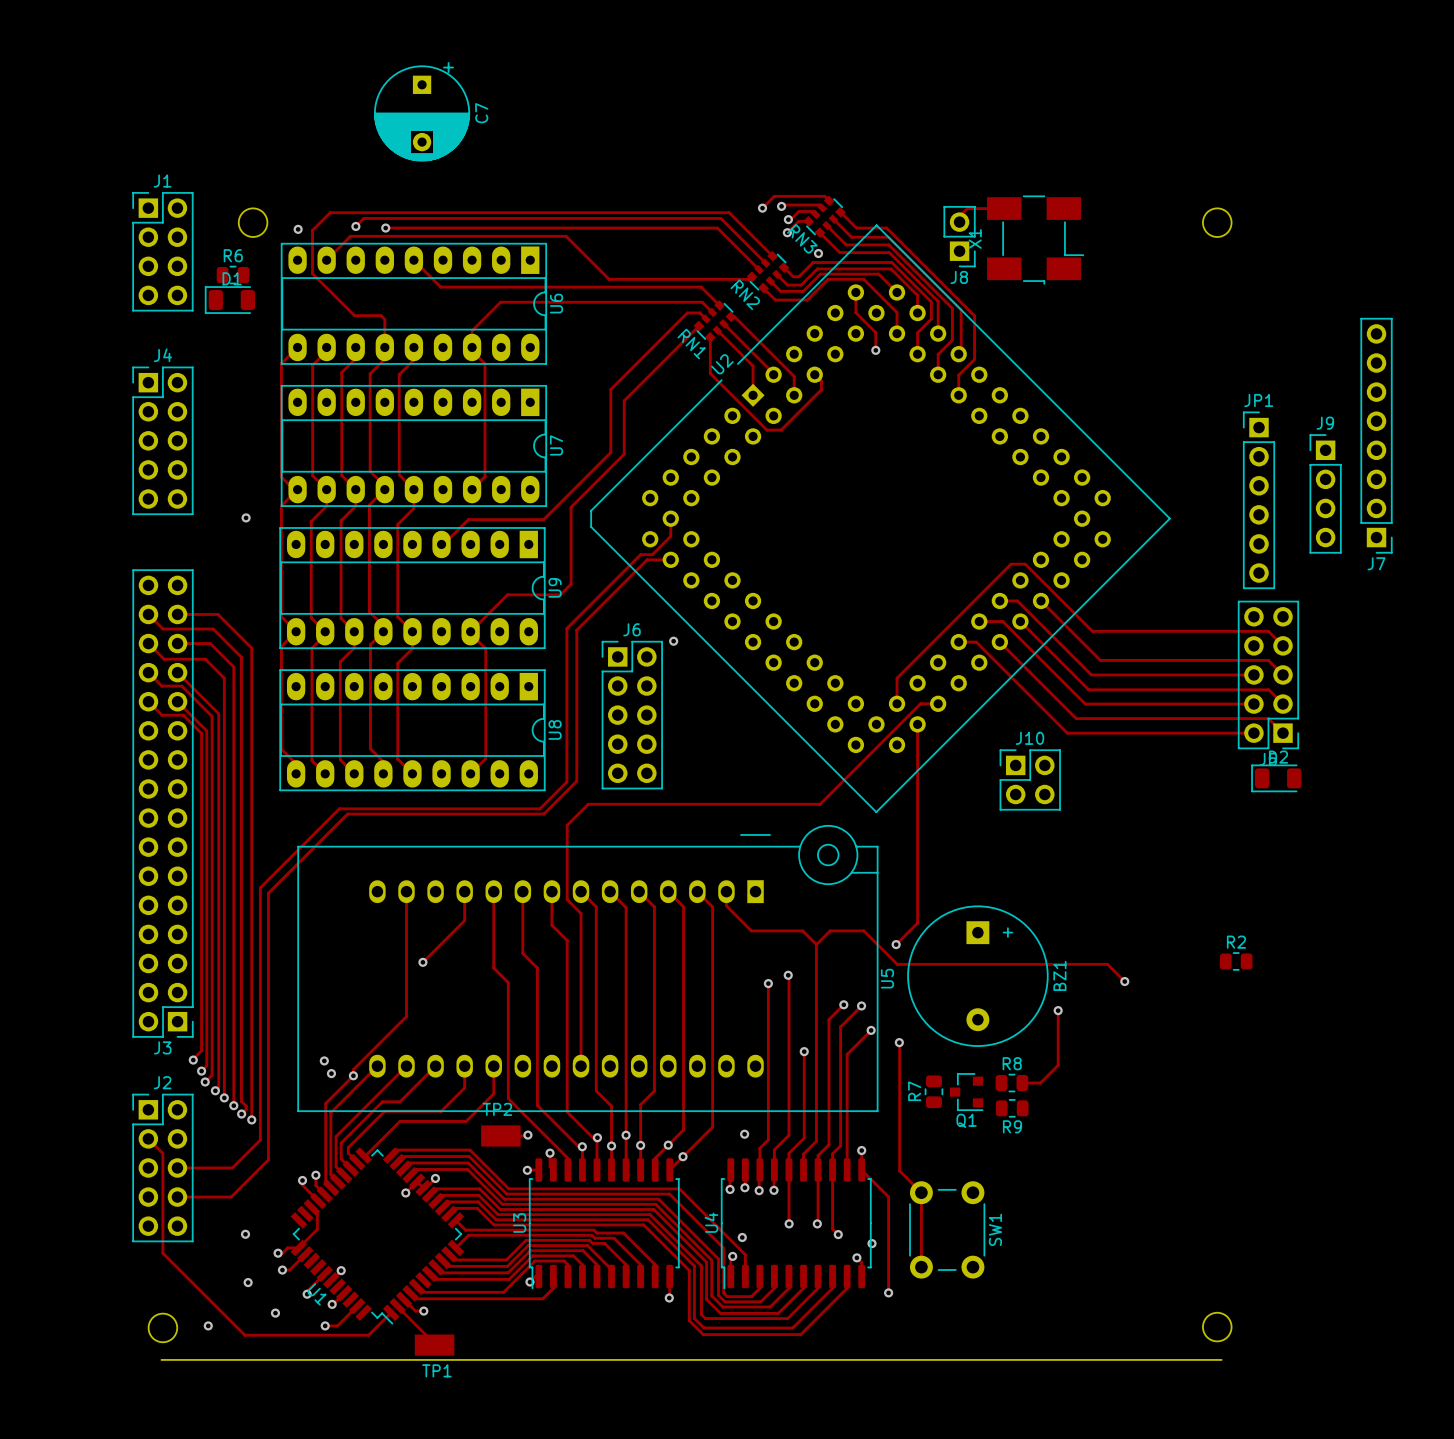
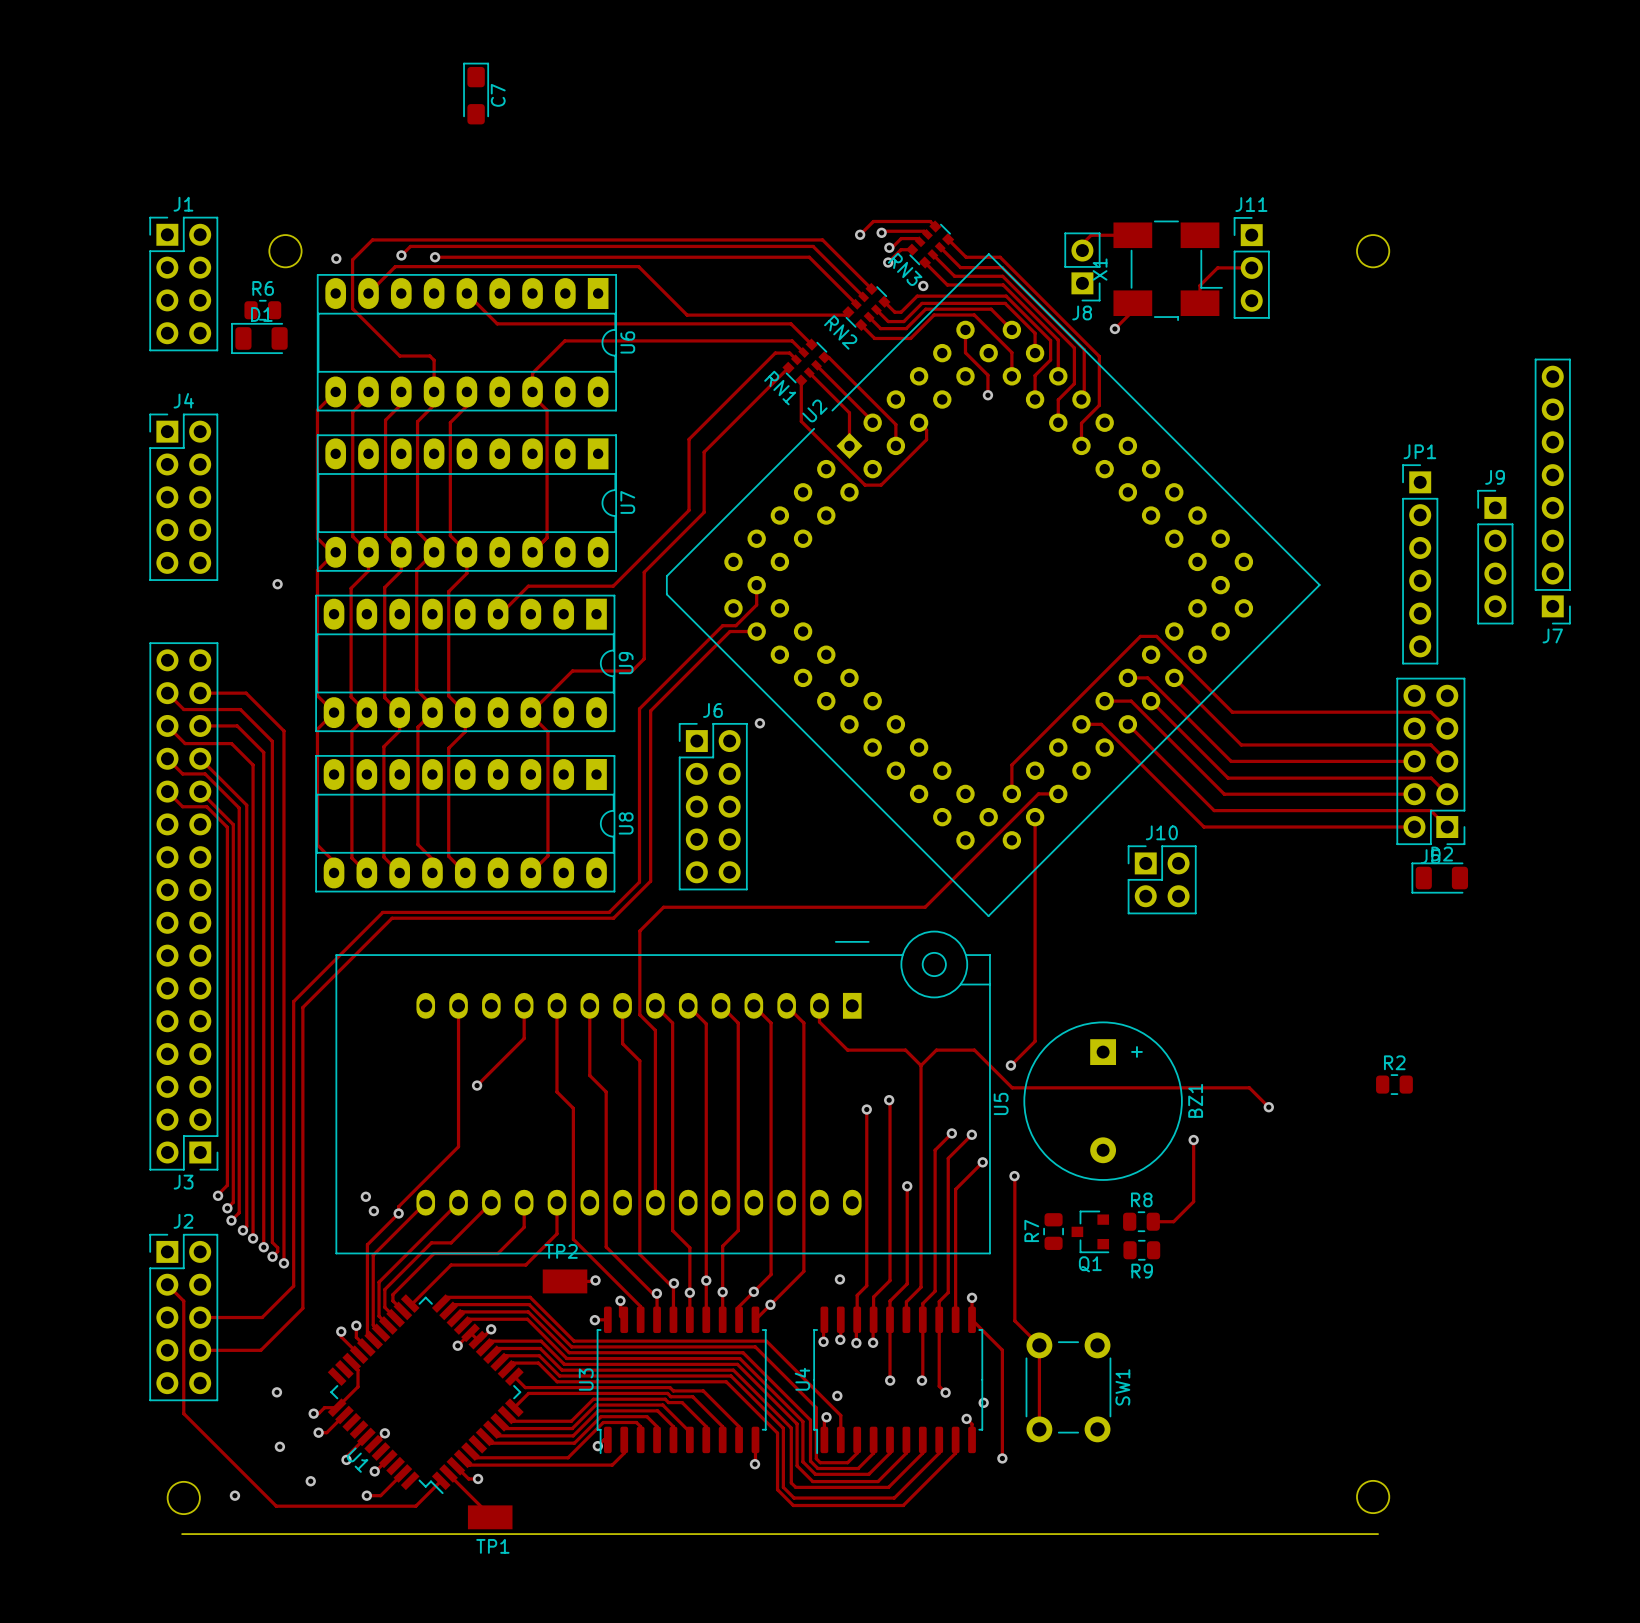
C7 footprint: [374, 62, 470, 162] -> [463, 62, 489, 125]
C7 name position: C7 (481, 113) -> C7 (498, 95)
track: none -> (1251, 267) (1217, 267) (1200, 285) (1200, 303)
J11: none -> (1251, 267)
track: none -> (1132, 303) (1132, 311) (1114, 328)
via: none -> (1114, 328)

